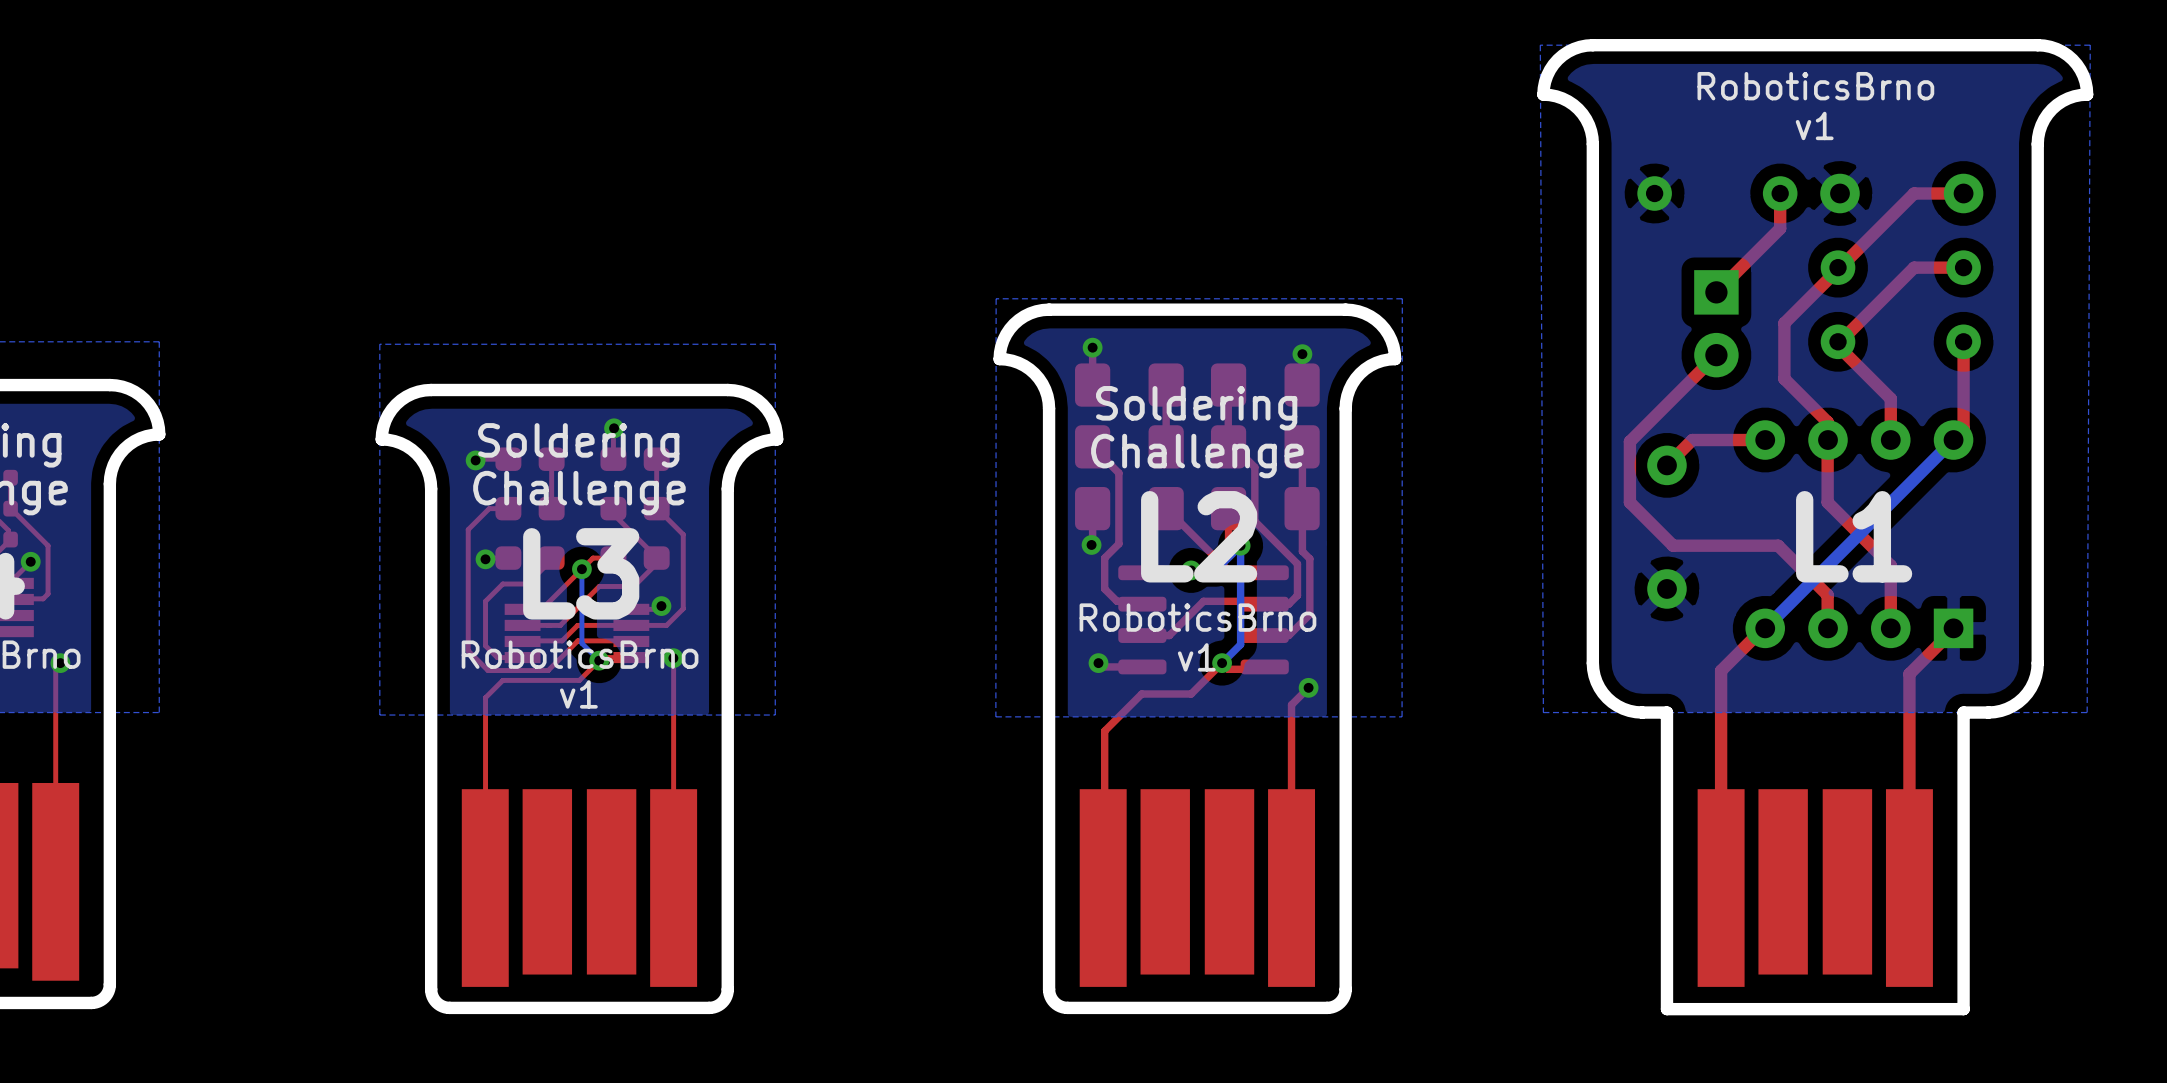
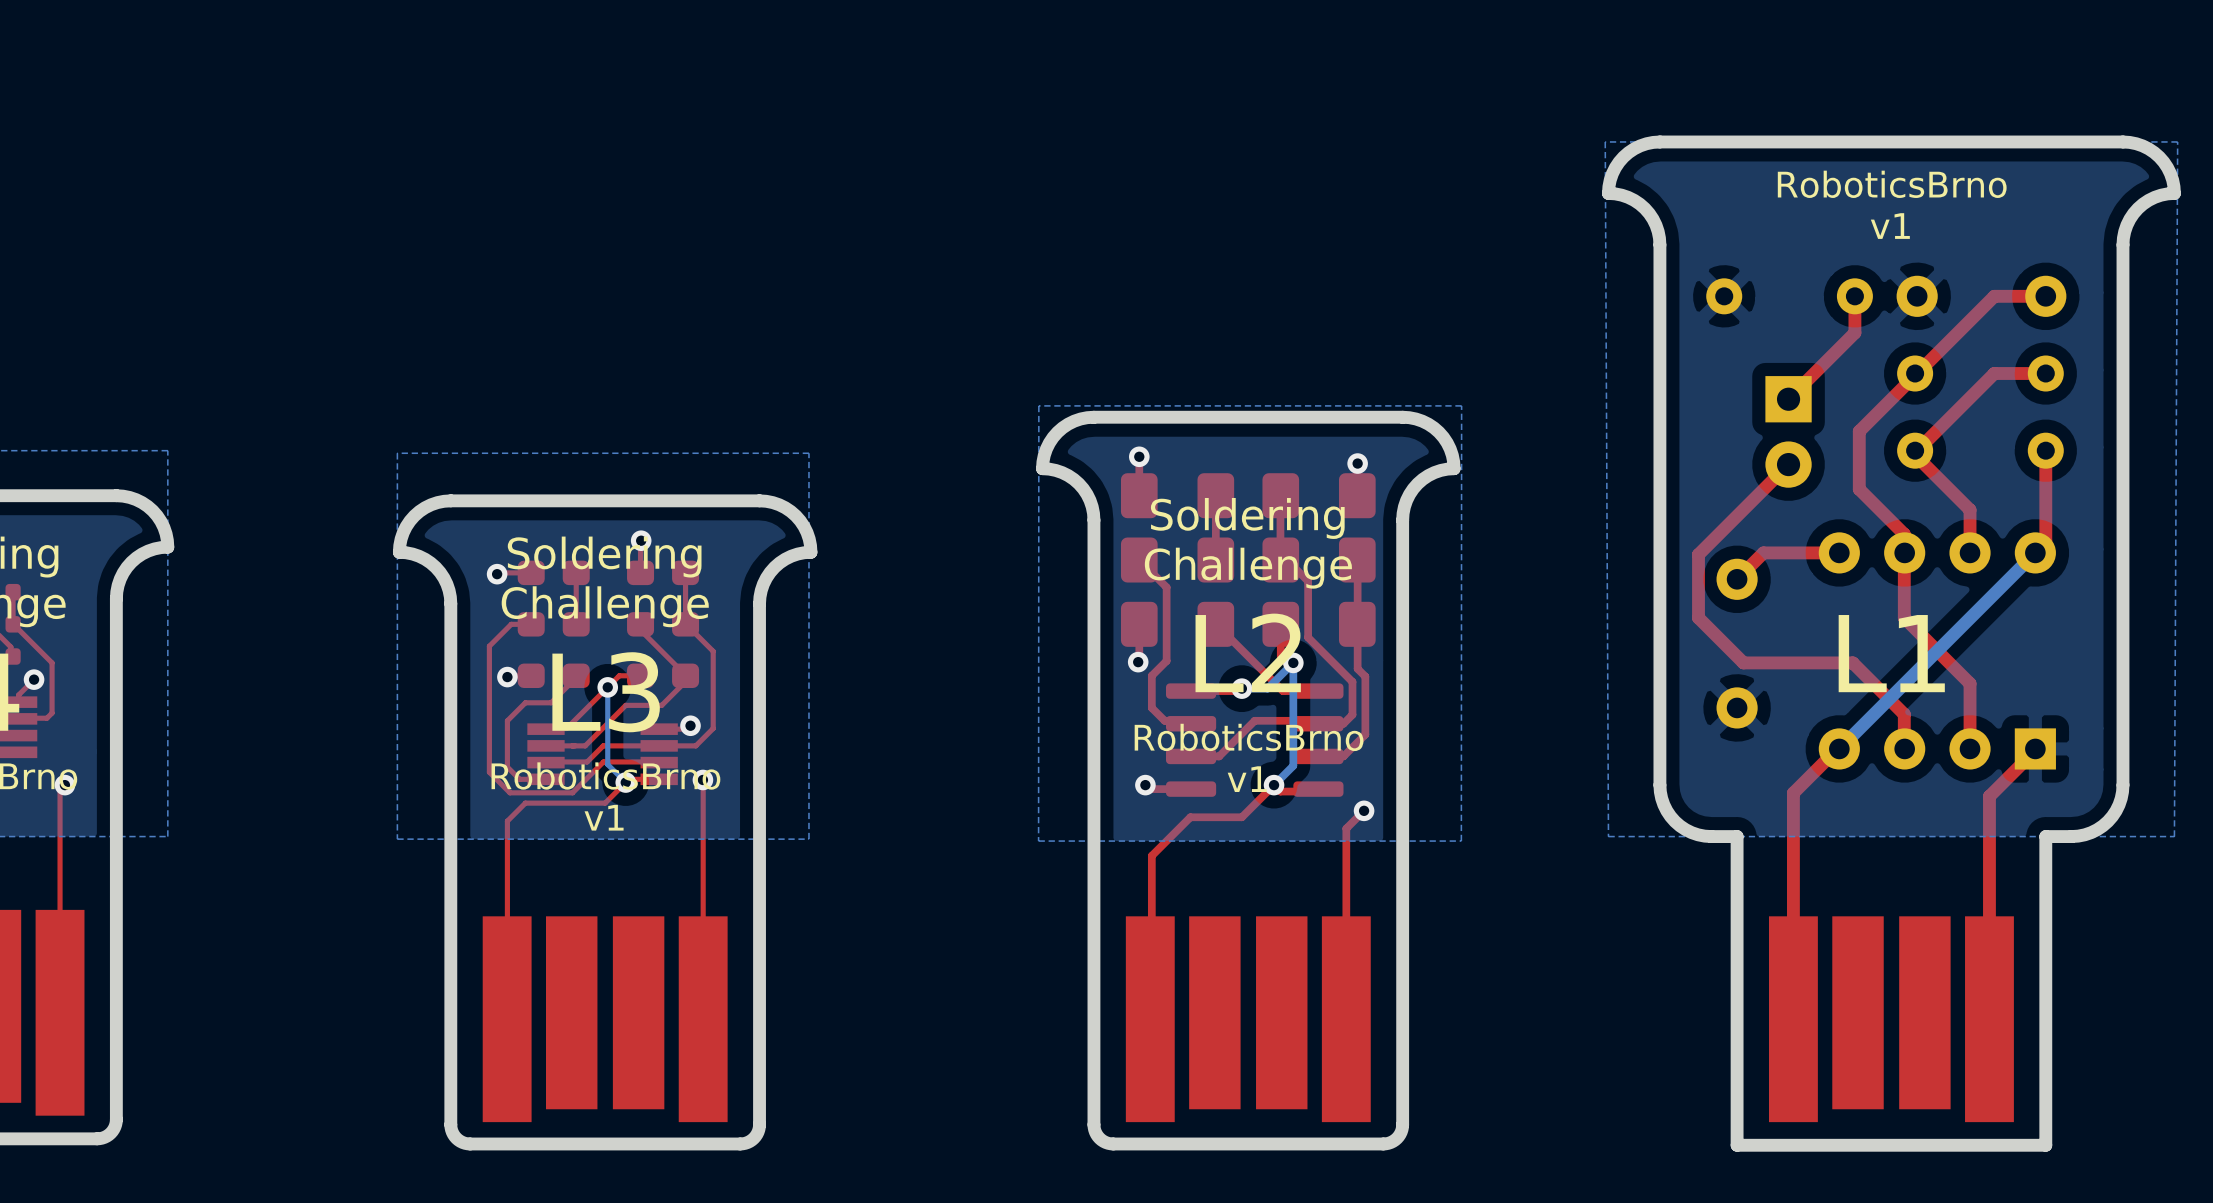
text position: L1 (1854, 536) -> L1 (1891, 653)

